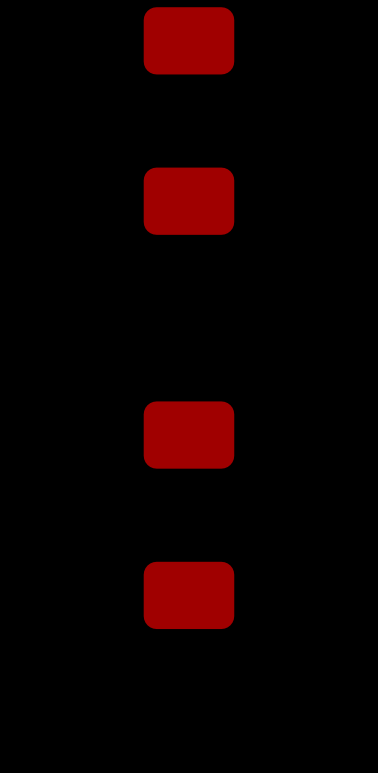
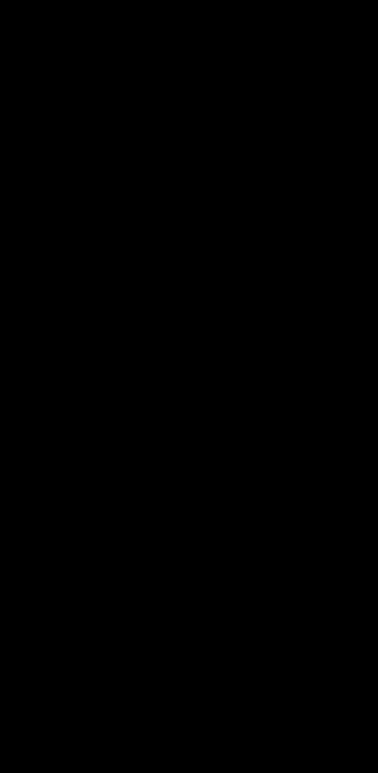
part: (188, 121) -> none
part: (188, 515) -> none

